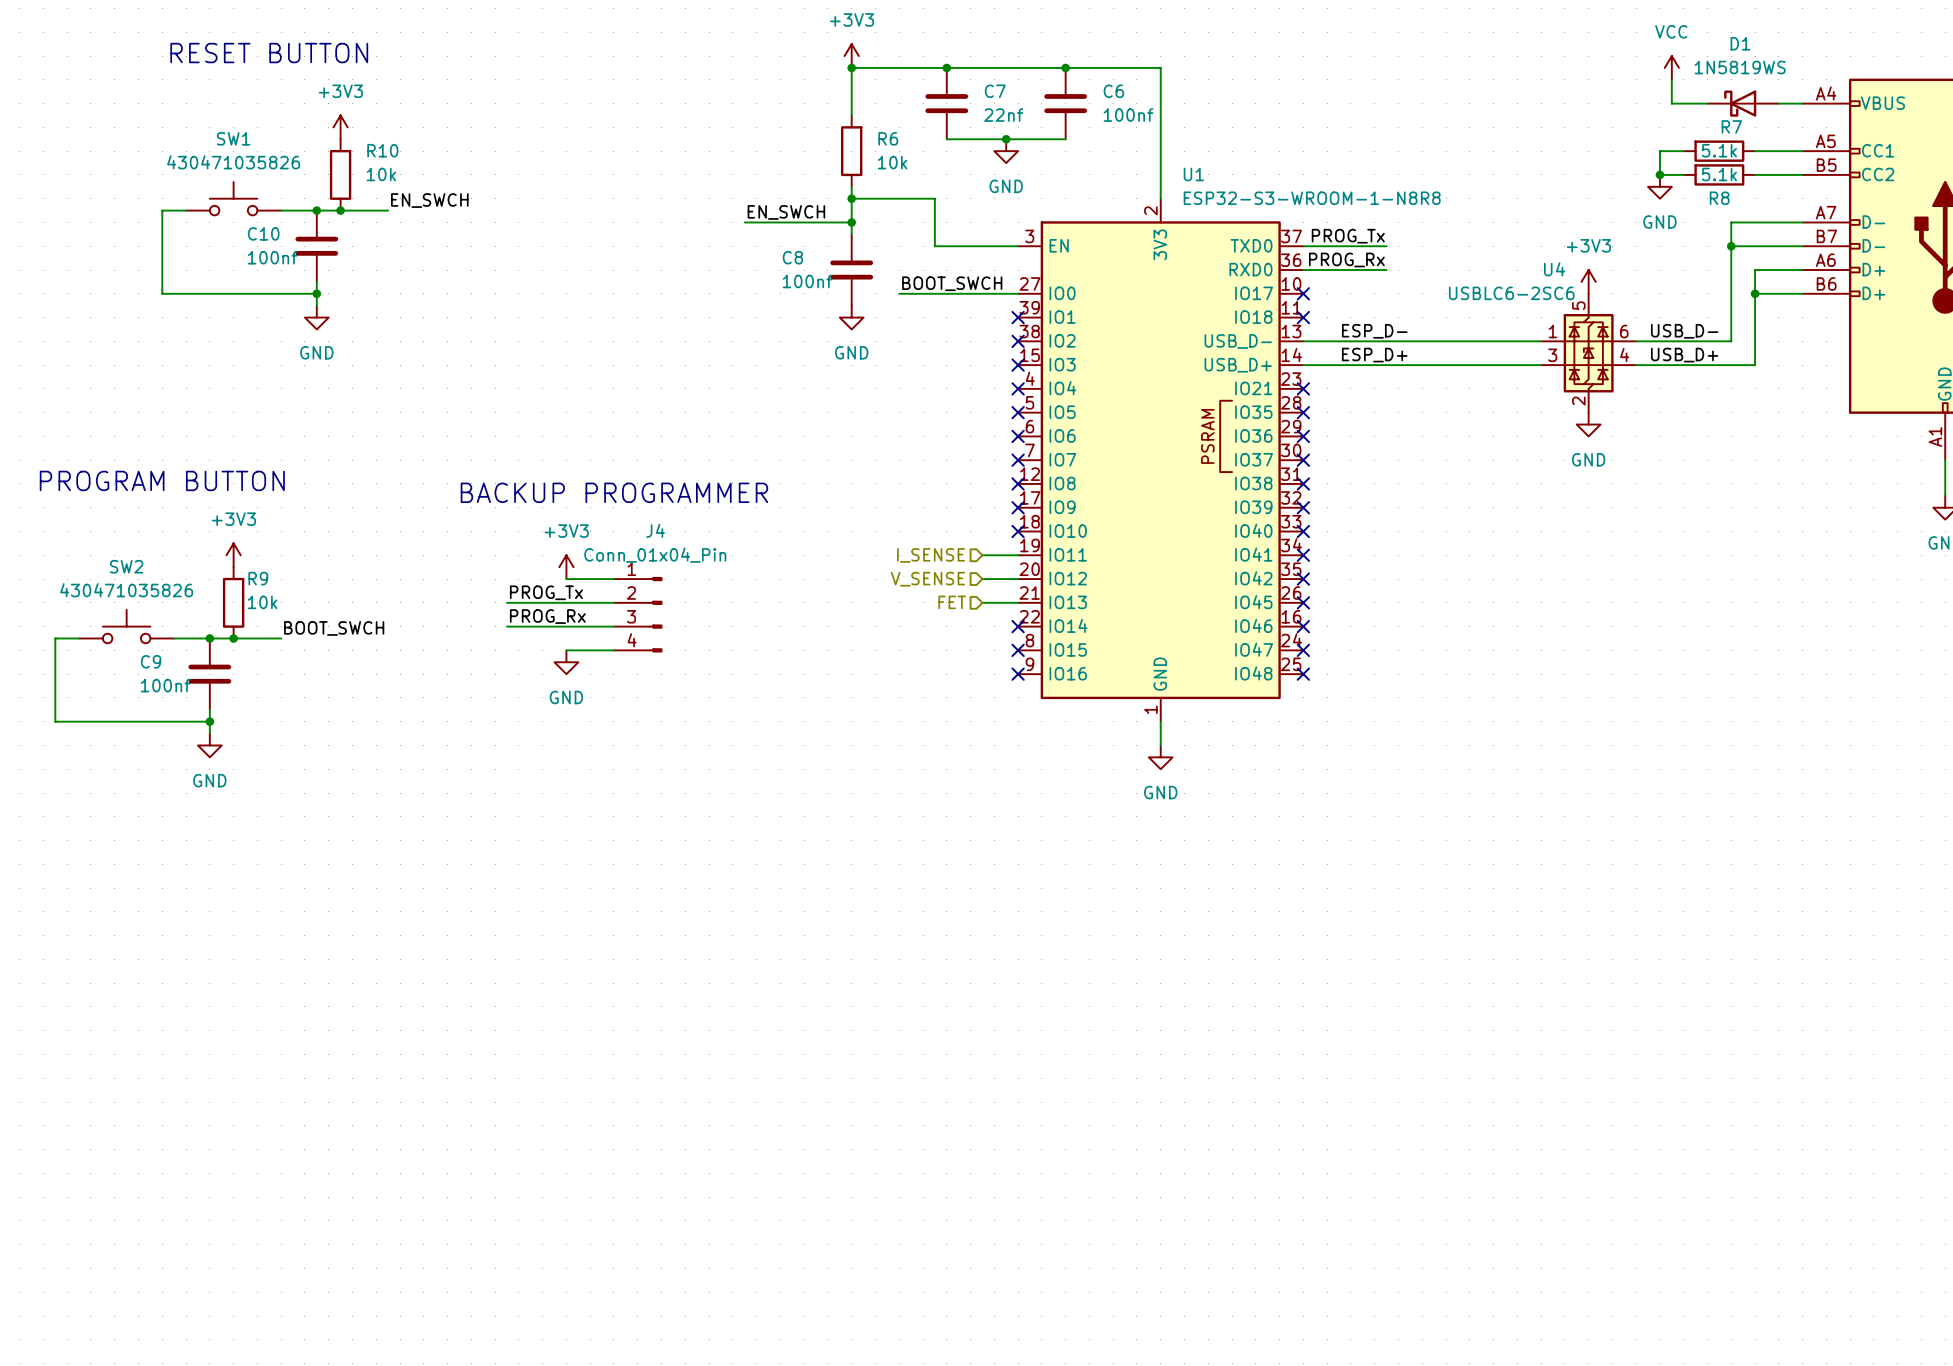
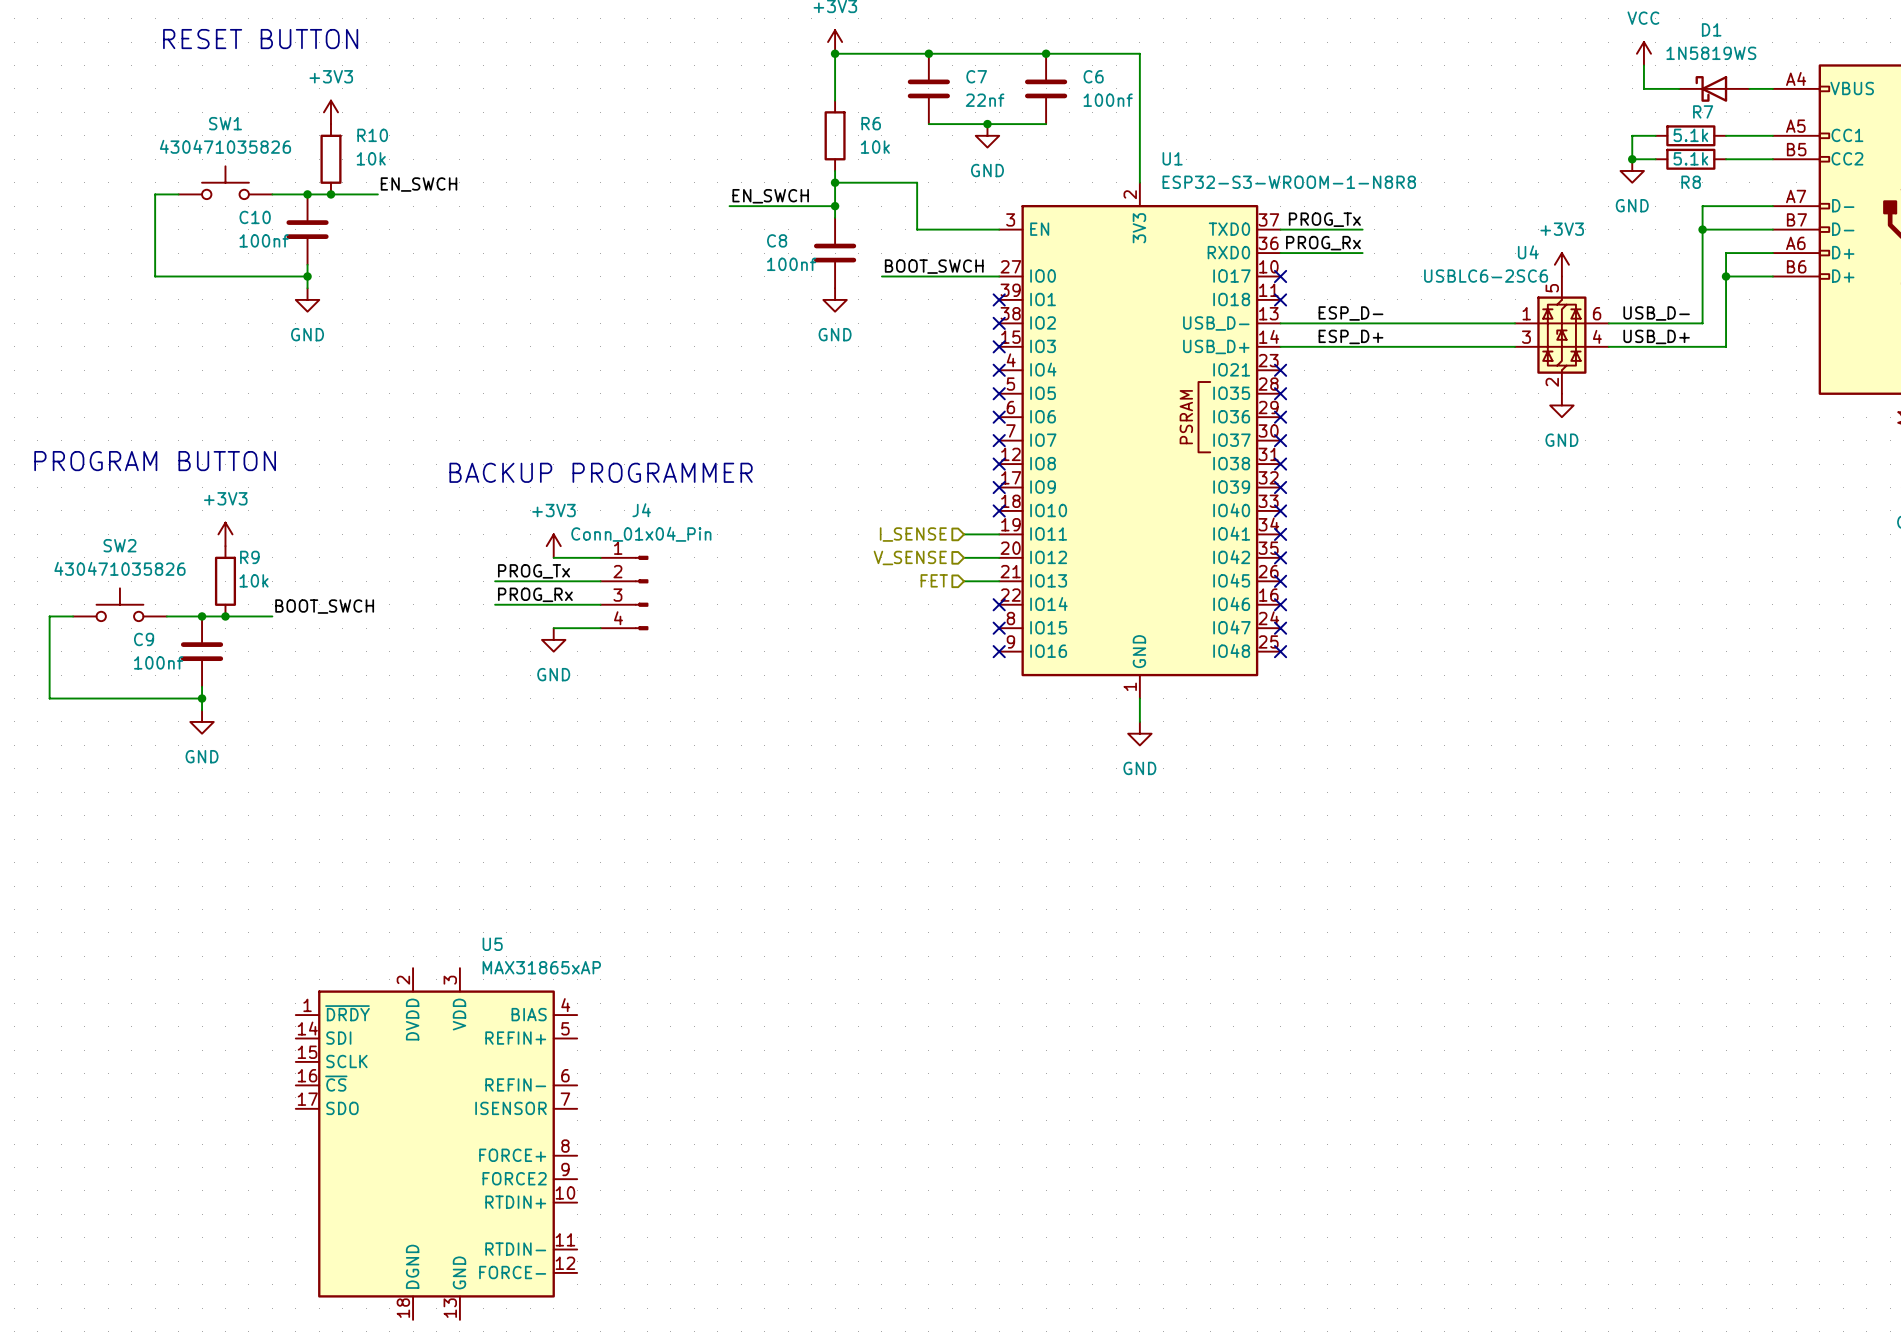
U5: none -> MAX31865xAP (436, 1144)

